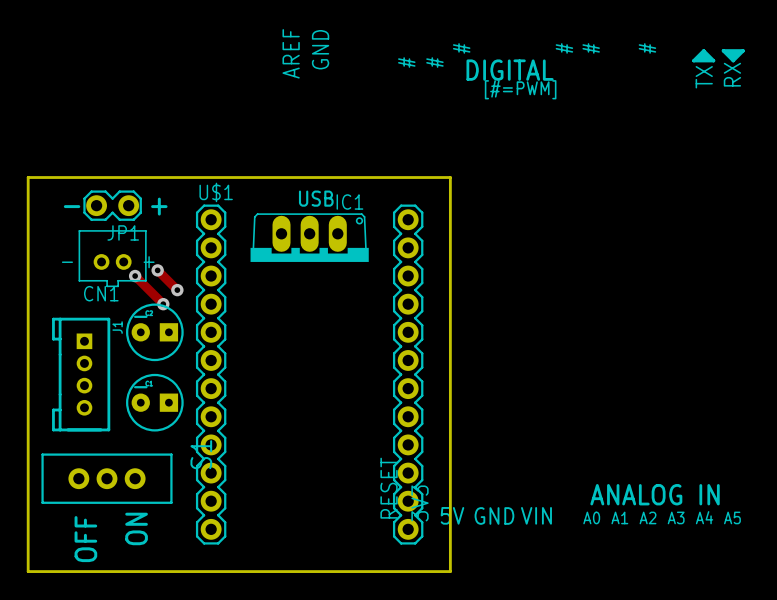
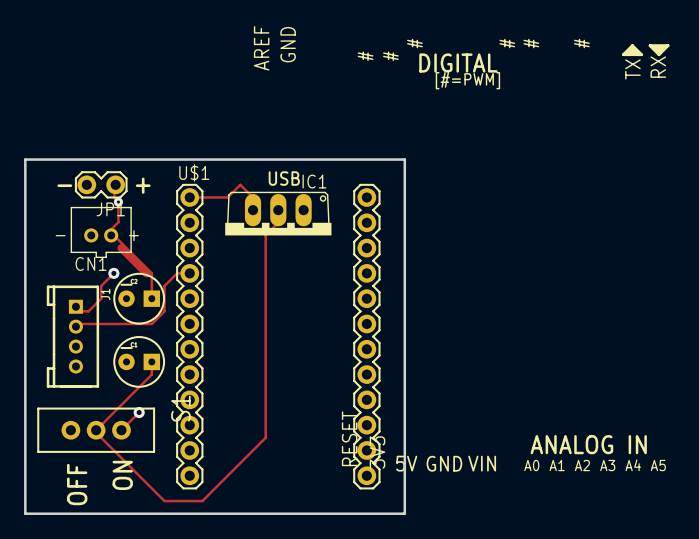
track: none -> (115, 184) (114, 197) (118, 202) (118, 222) (110, 230) (110, 234) (113, 235) (151, 273) (151, 298)
track: none -> (189, 197) (227, 197) (240, 184) (253, 197) (253, 210)
via: none -> (118, 202)
track: none -> (278, 210) (278, 222) (265, 235) (265, 437) (202, 501) (164, 501) (101, 437) (96, 430) (151, 374) (151, 361)
track: (157, 270) (177, 290) -> none
via: (157, 270) -> none
via: (135, 276) -> none
via: (177, 290) -> none
track: none -> (113, 273) (101, 286) (101, 298) (88, 311) (75, 311) (75, 306)
via: none -> (113, 273)
via: (163, 304) -> none
track: none -> (189, 273) (177, 273) (164, 286) (164, 311) (151, 323) (75, 323) (75, 326)
track: none -> (139, 412) (121, 430)
via: none -> (139, 412)

